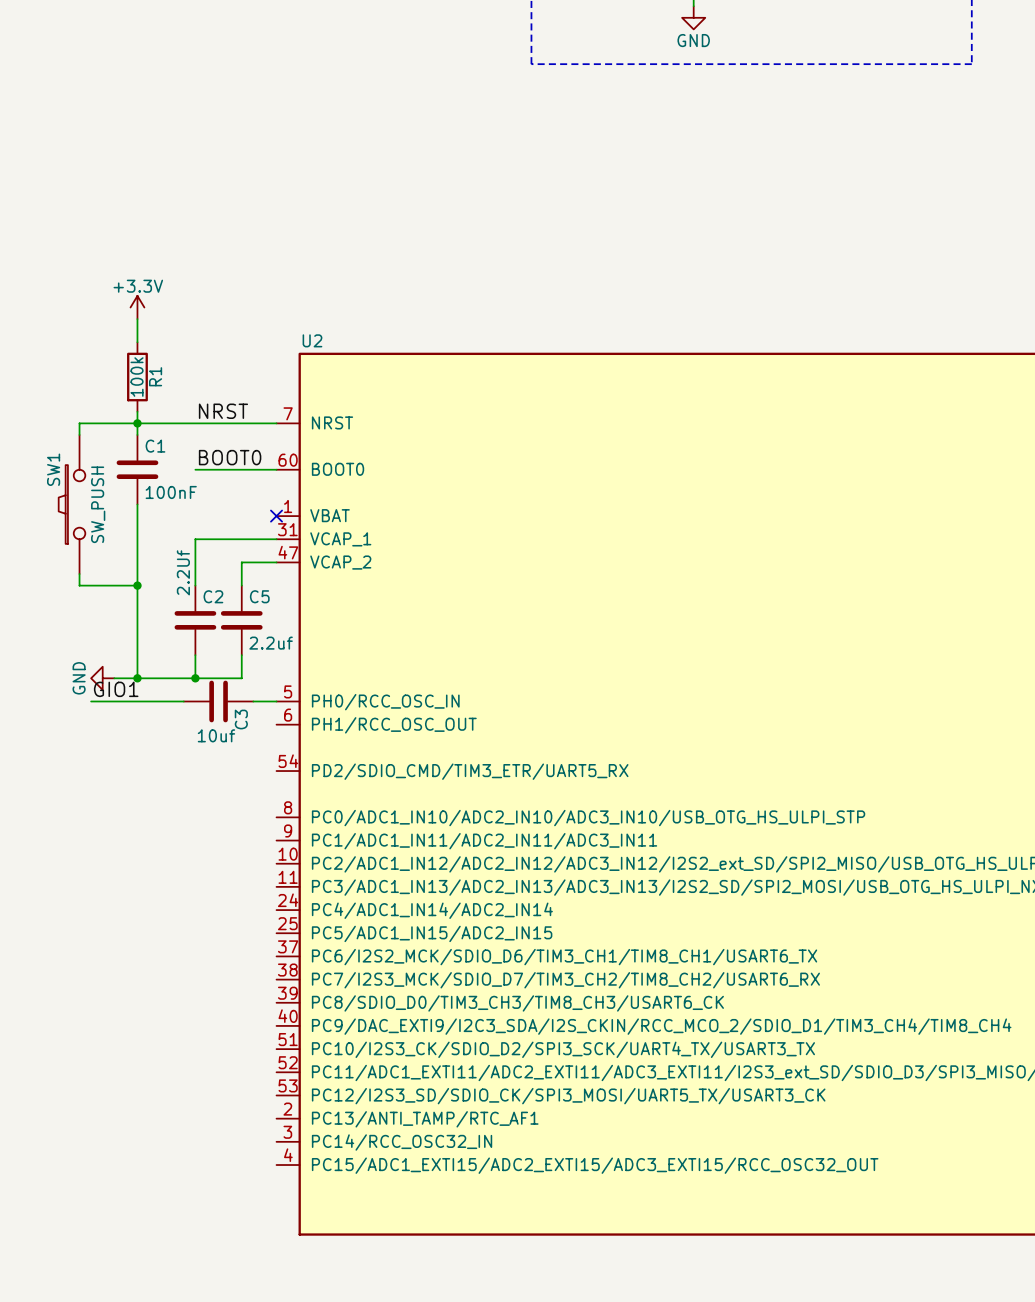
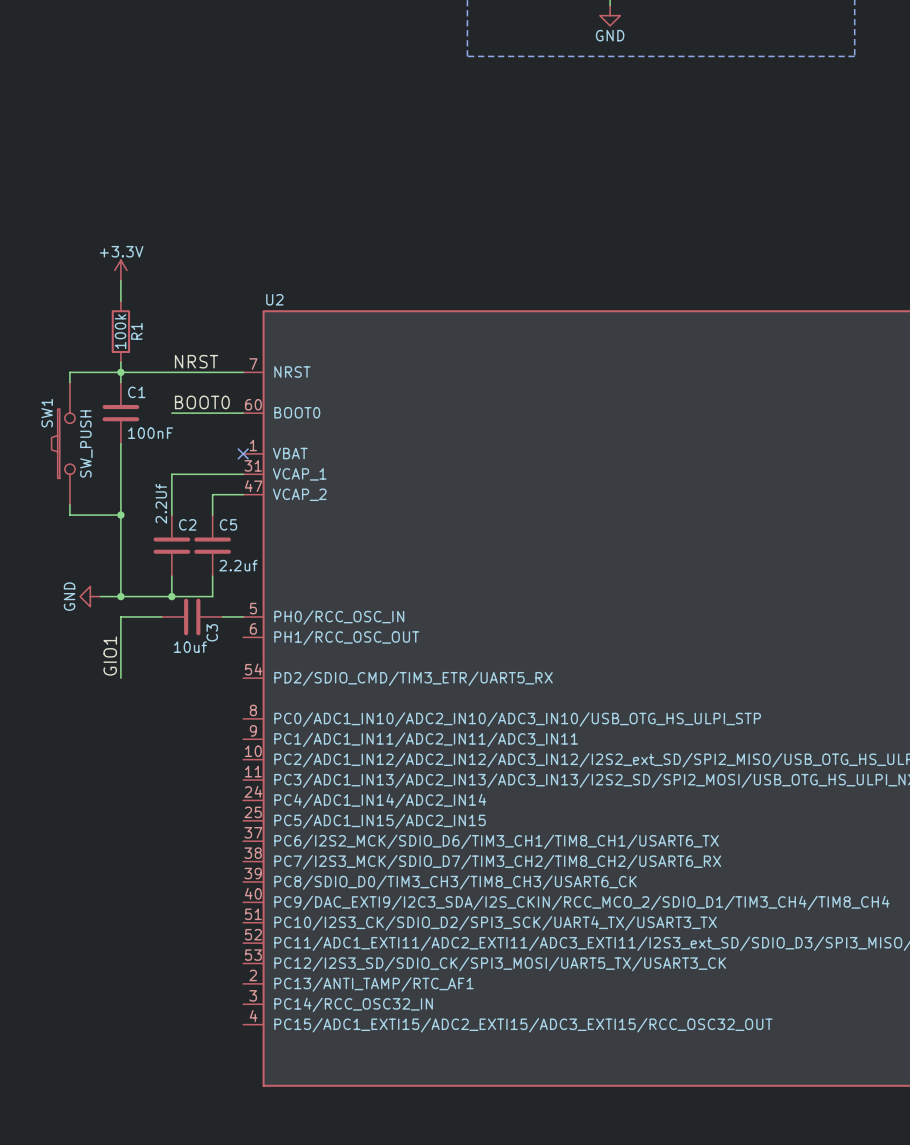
label rotation: 0° (116, 689) -> 90° counterclockwise (110, 656)
wire: (91, 701) (137, 701) -> (120, 678) (120, 616)

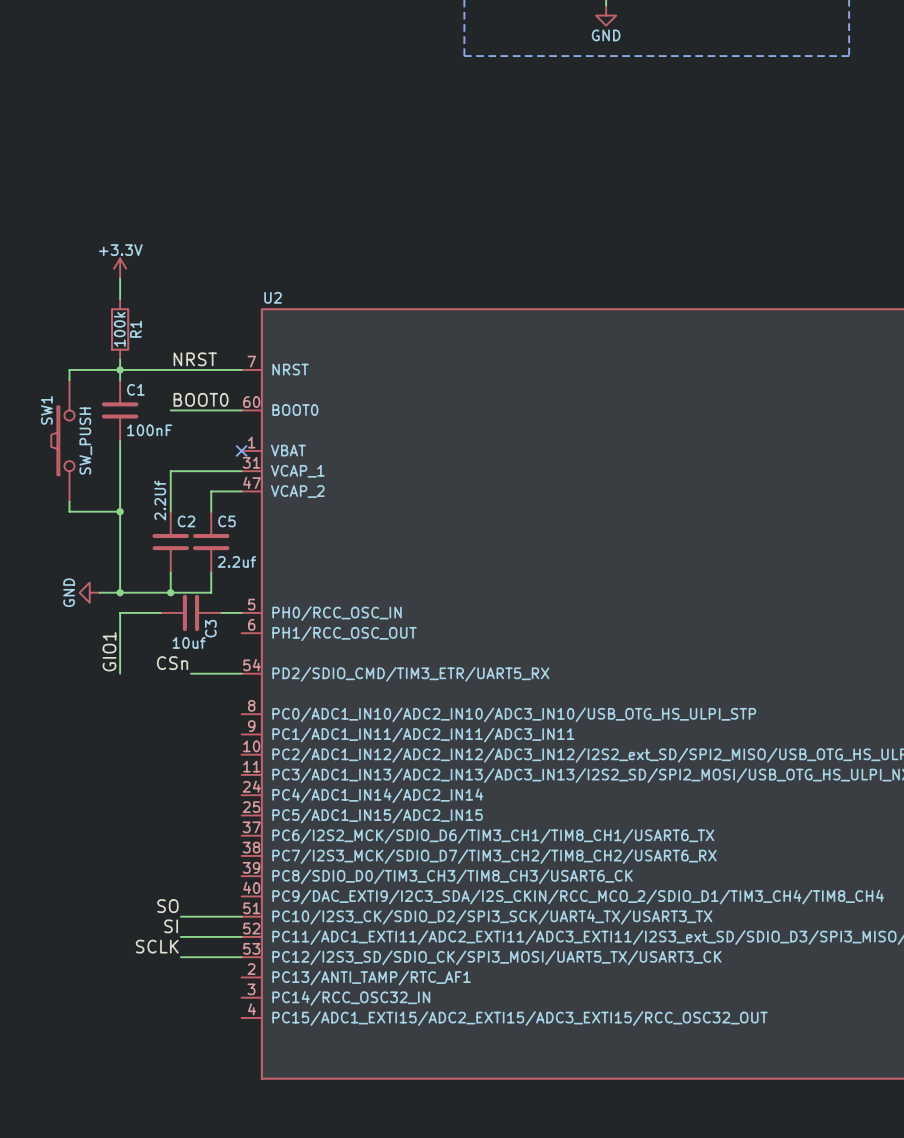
label: none -> CSn (172, 663)
wire: none -> (190, 673) (241, 673)
label: none -> SO (167, 906)
wire: none -> (180, 916) (241, 916)
label: none -> SI (171, 926)
wire: none -> (180, 936) (241, 936)
label: none -> SCLK (157, 946)
wire: none -> (180, 957) (241, 957)

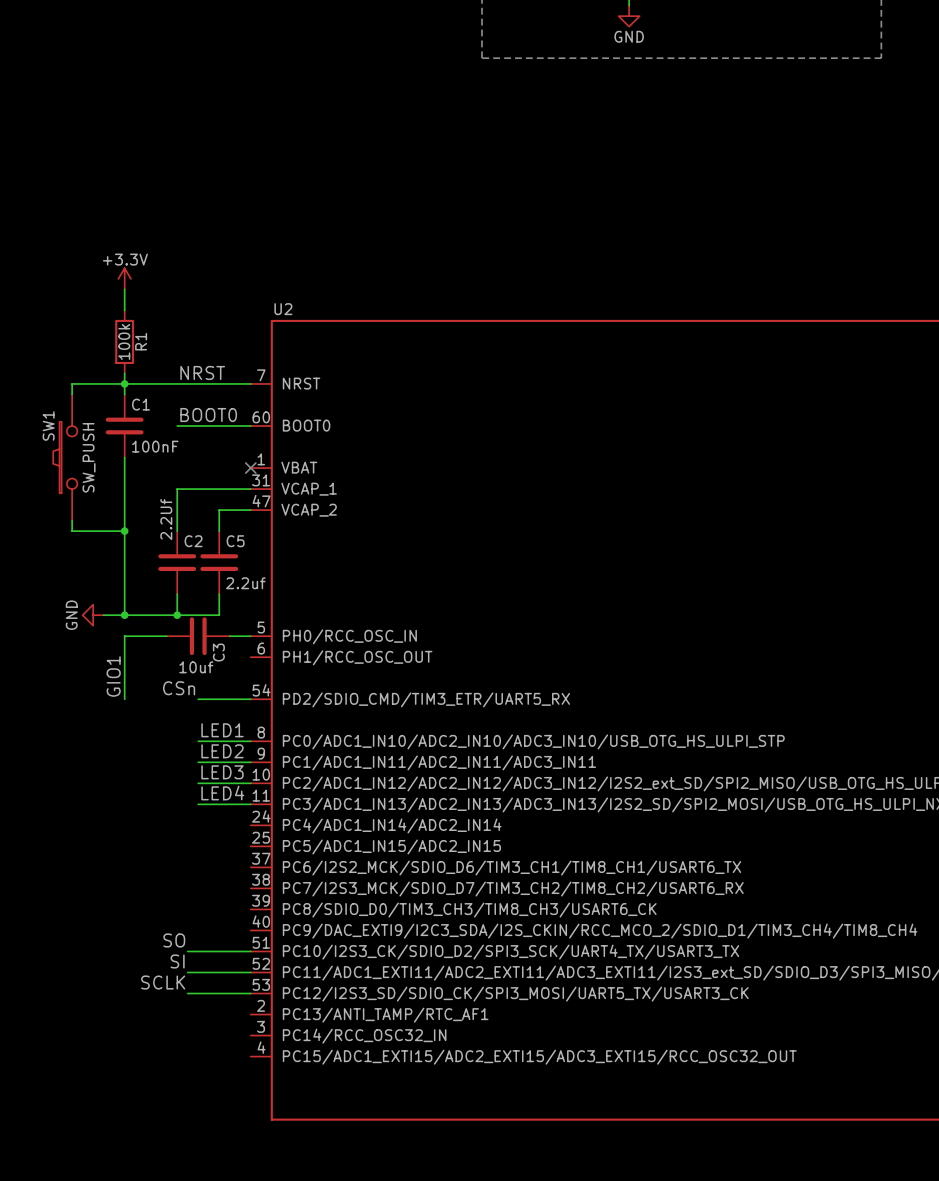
label: none -> LED1 (222, 730)
wire: none -> (198, 741) (250, 741)
label: none -> LED2 (222, 751)
wire: none -> (198, 762) (250, 762)
label: none -> LED3 (222, 772)
wire: none -> (198, 783) (250, 783)
label: none -> LED4 (222, 793)
wire: none -> (198, 804) (250, 804)

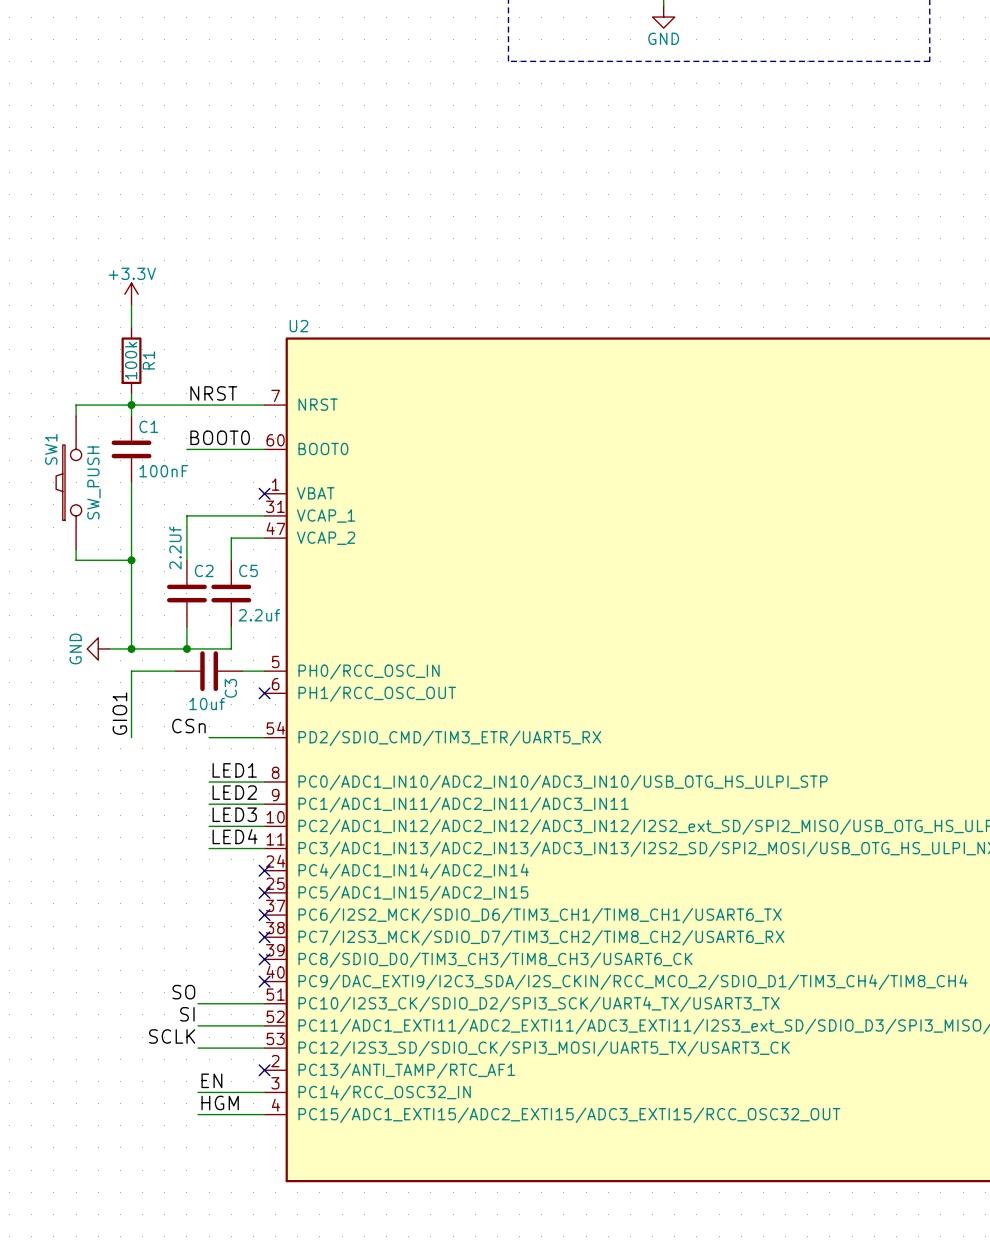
no-connect mark: none -> (264, 693)
no-connect mark: none -> (264, 870)
no-connect mark: none -> (264, 892)
no-connect mark: none -> (264, 915)
no-connect mark: none -> (264, 937)
no-connect mark: none -> (264, 959)
no-connect mark: none -> (264, 981)
no-connect mark: none -> (264, 1070)
label: none -> EN (211, 1080)
wire: none -> (198, 1092) (264, 1092)
label: none -> HGM (220, 1103)
wire: none -> (198, 1114) (264, 1114)

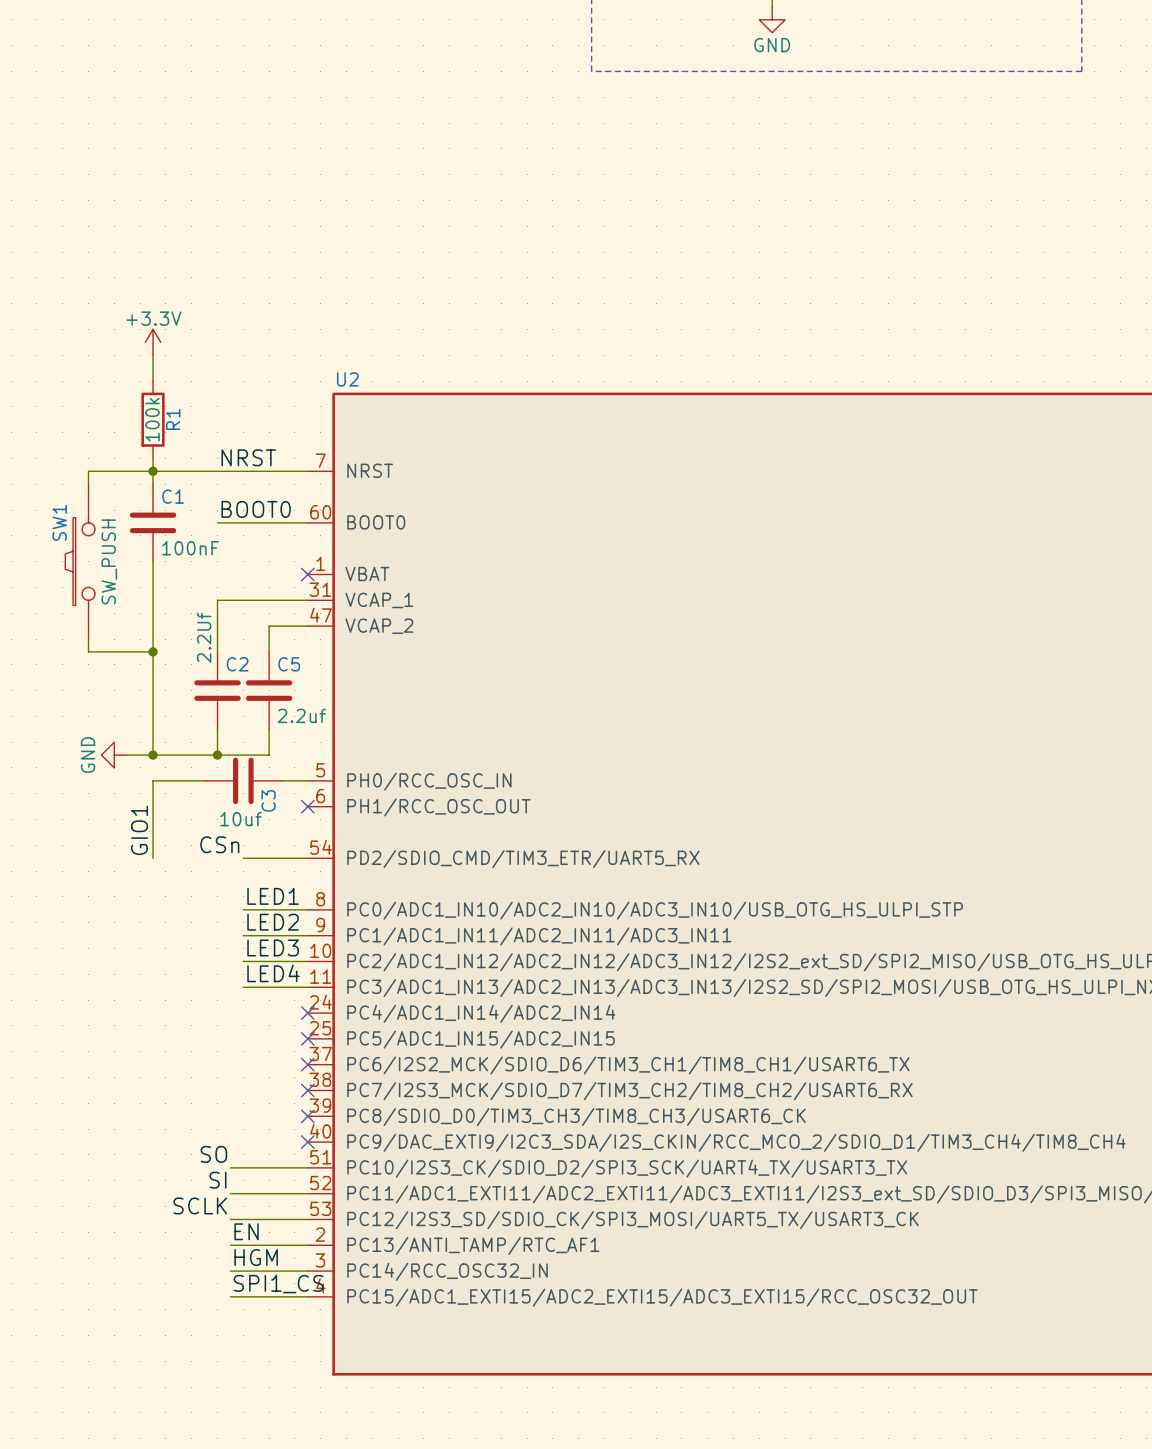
label: none -> EN (246, 1231)
wire: none -> (230, 1245) (307, 1245)
no-connect mark: (264, 1070) -> none
label: EN (211, 1080) -> HGM (256, 1257)
label: HGM (220, 1103) -> SPI1_CS (278, 1284)

